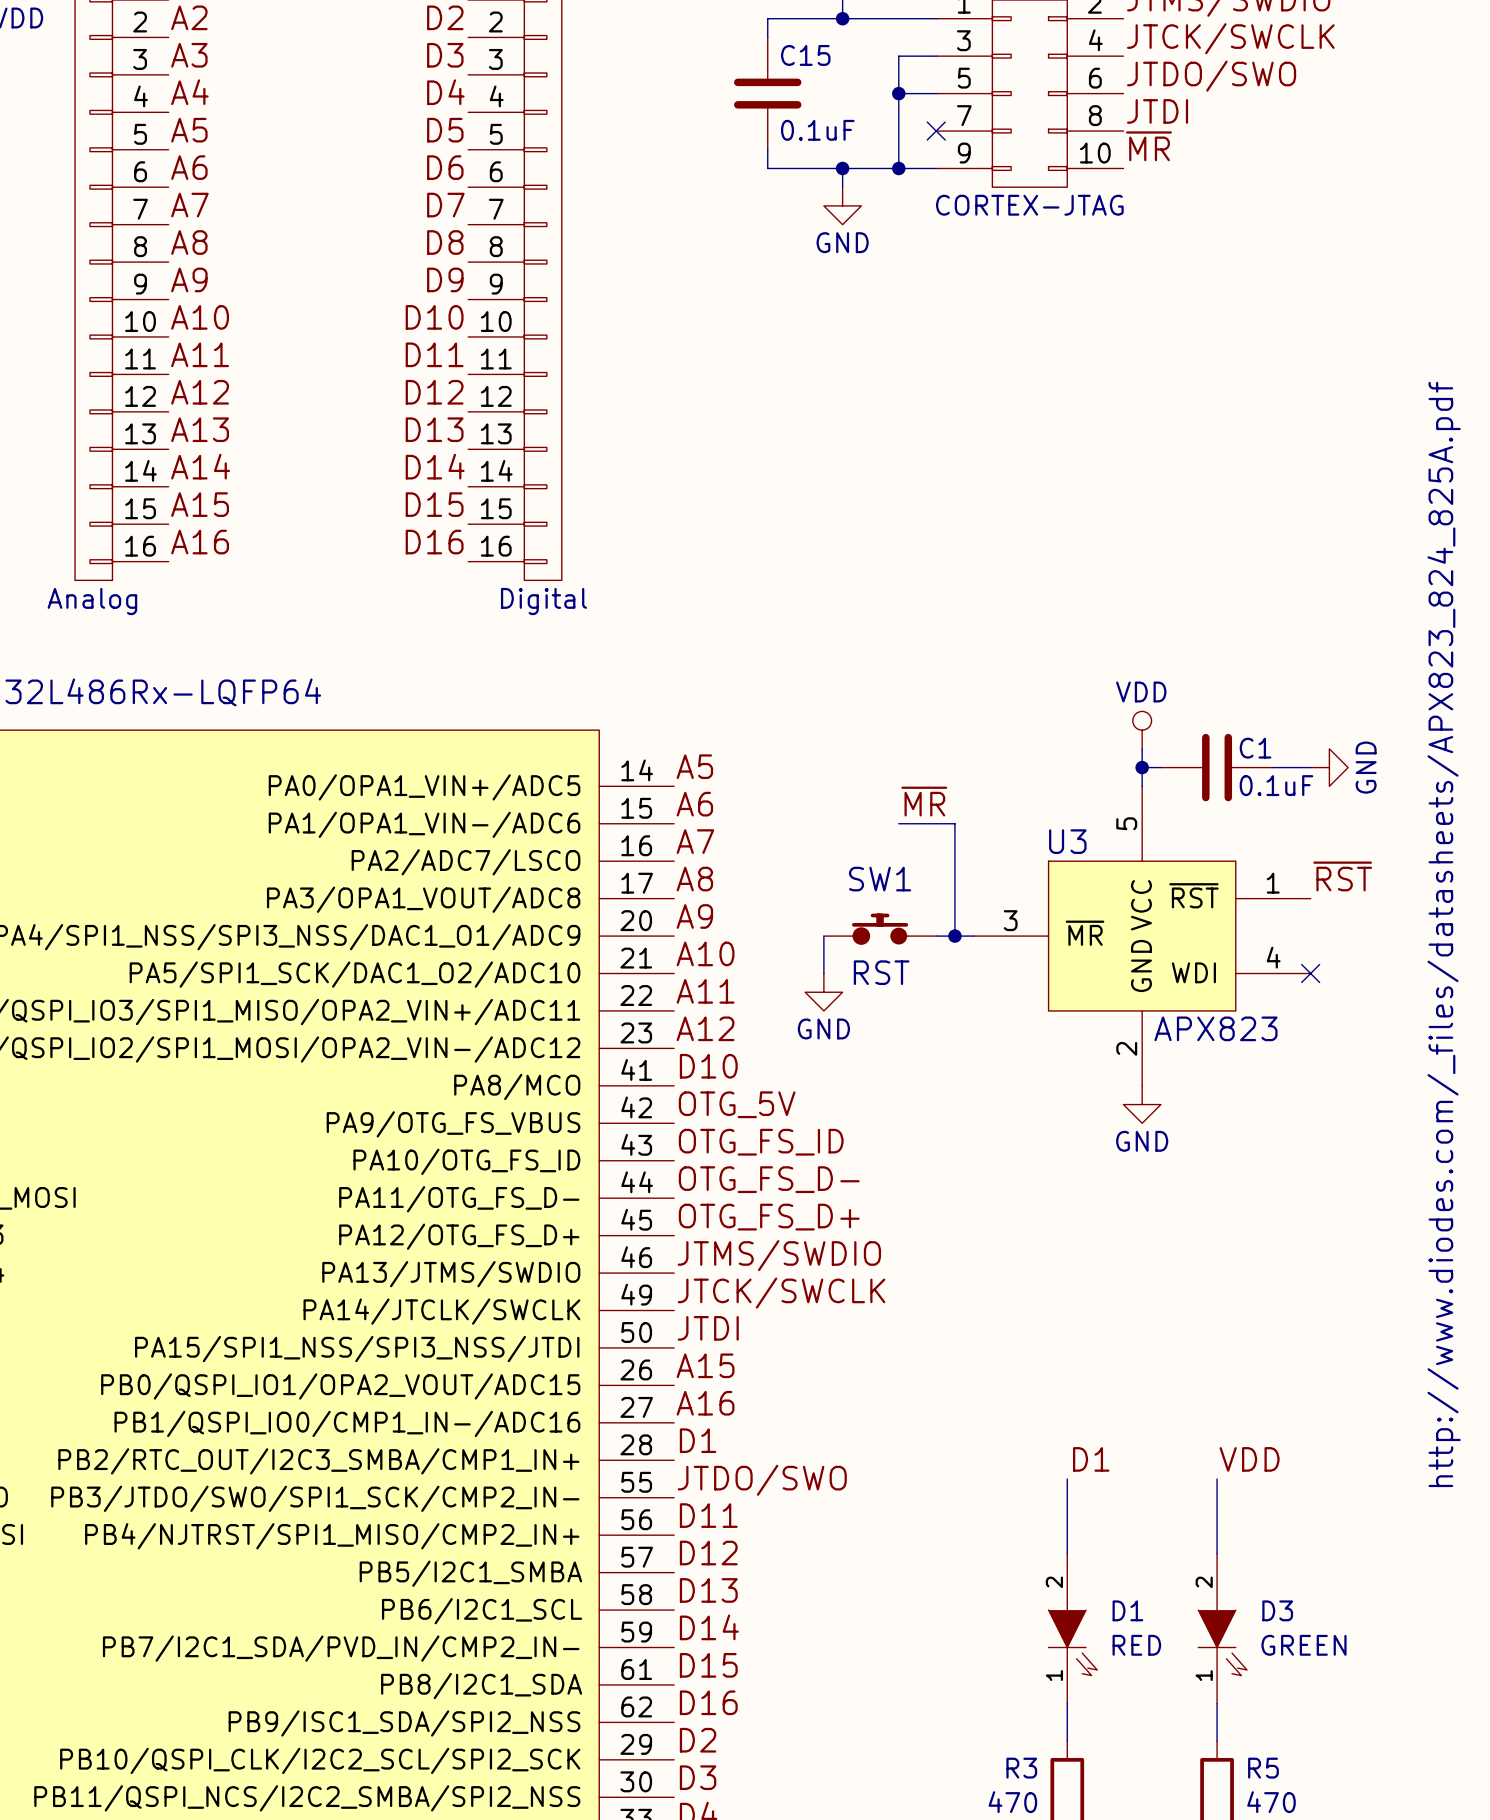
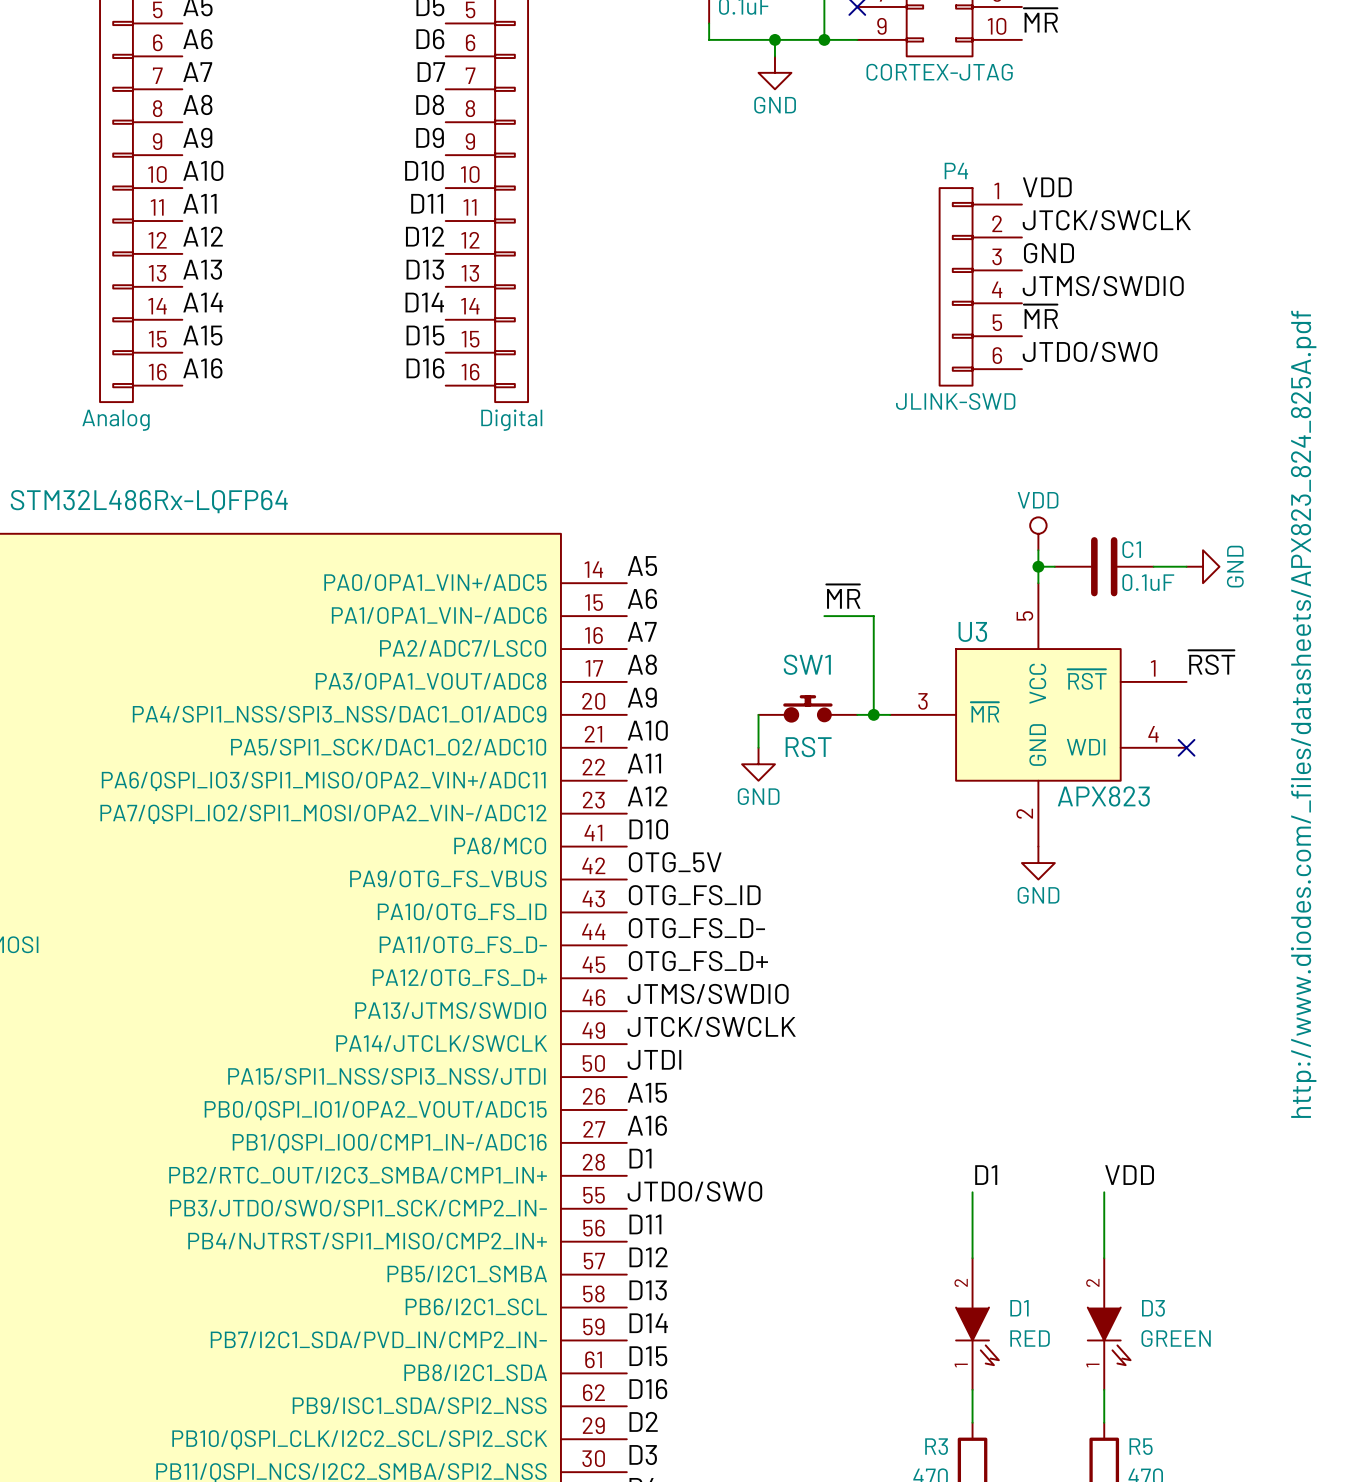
label: none -> VDD (1047, 187)
label: none -> JTCK/SWCLK (1106, 220)
label: none -> GND (1048, 253)
P4: none -> JLINK-SWD (980, 286)
label: none -> JTMS/SWDIO (1103, 286)
label: none -> ~{MR} (1040, 316)
label: none -> JTDO/SWO (1090, 351)

